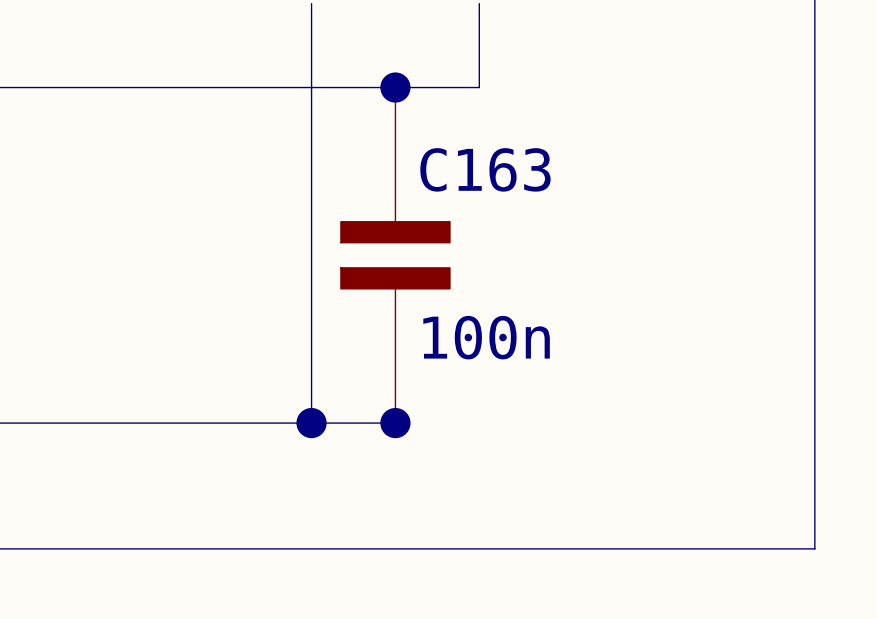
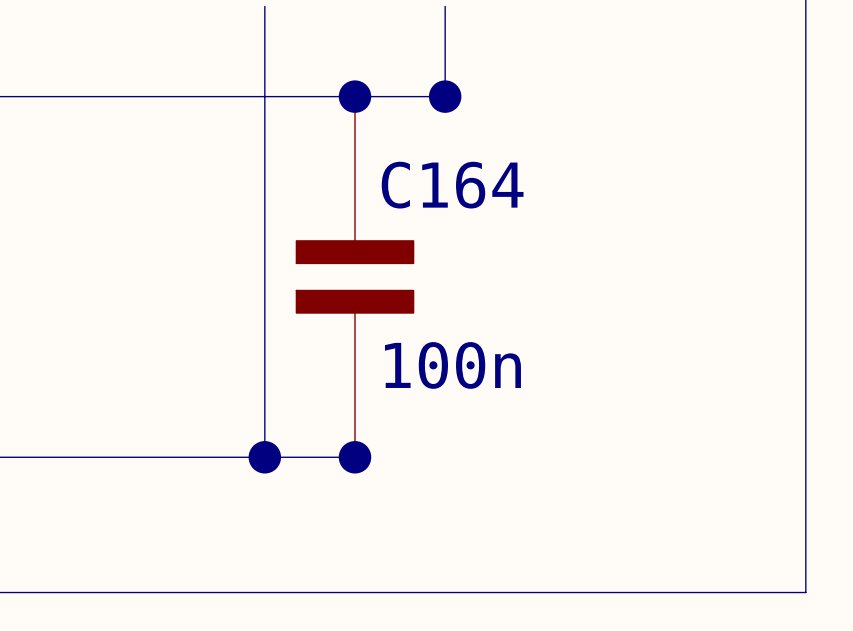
junction: none -> (445, 96)
C163 name: C163 (485, 169) -> C164 (452, 185)

